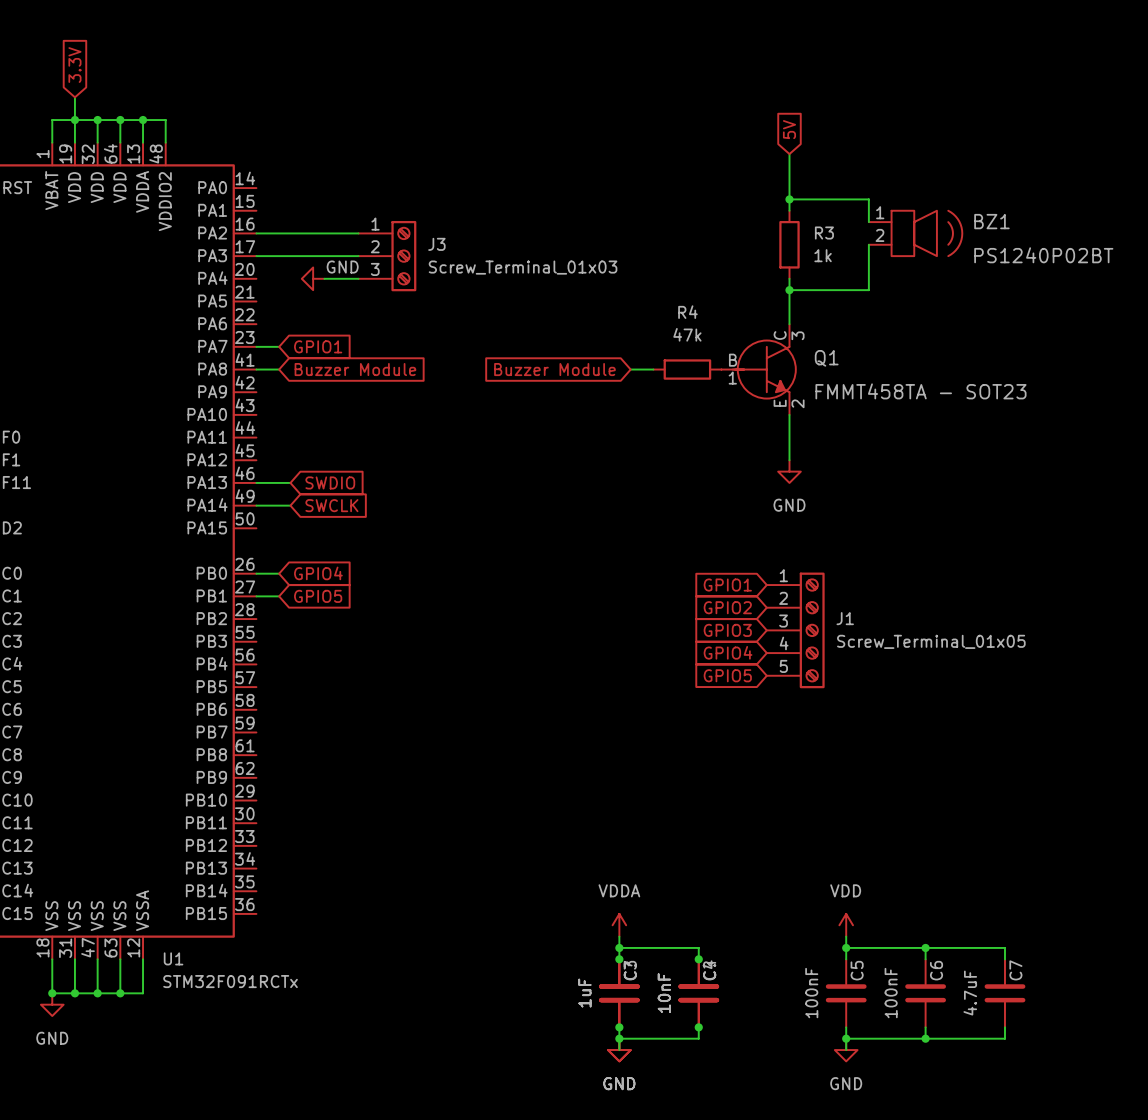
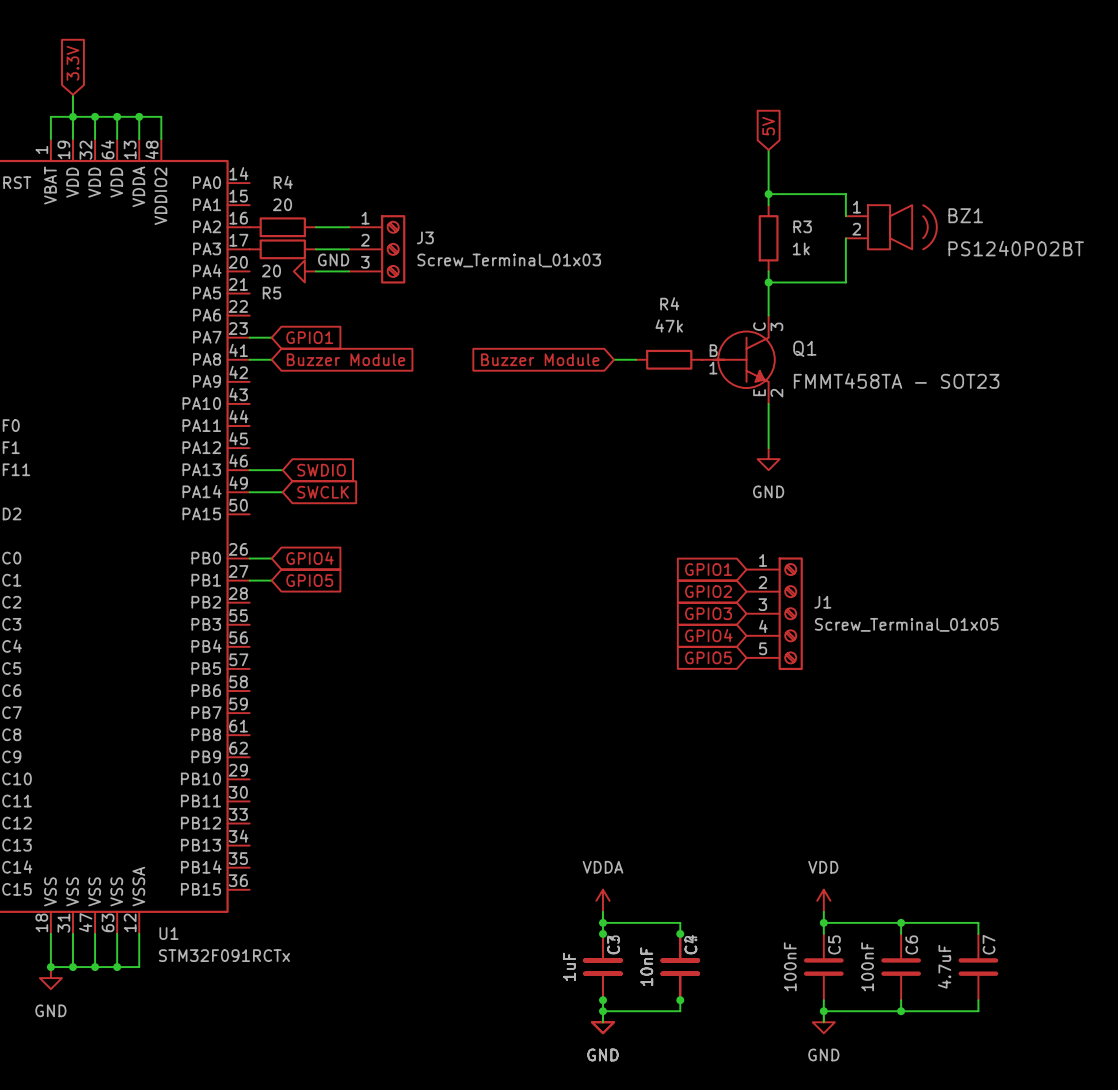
wire: (256, 233) (324, 233) -> none
R4: none -> 20 (282, 227)
wire: (256, 256) (324, 256) -> none
R5: none -> 20 (282, 249)

